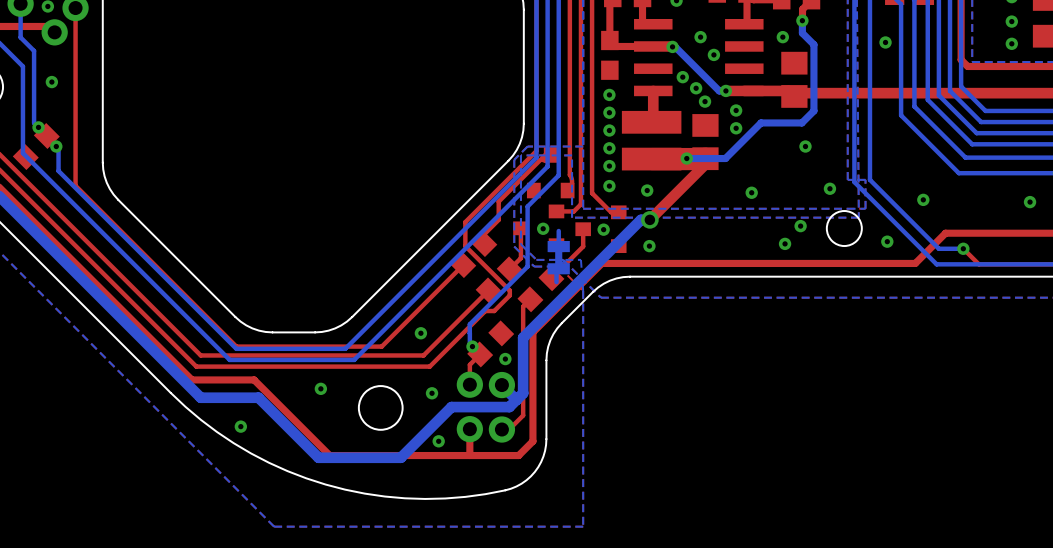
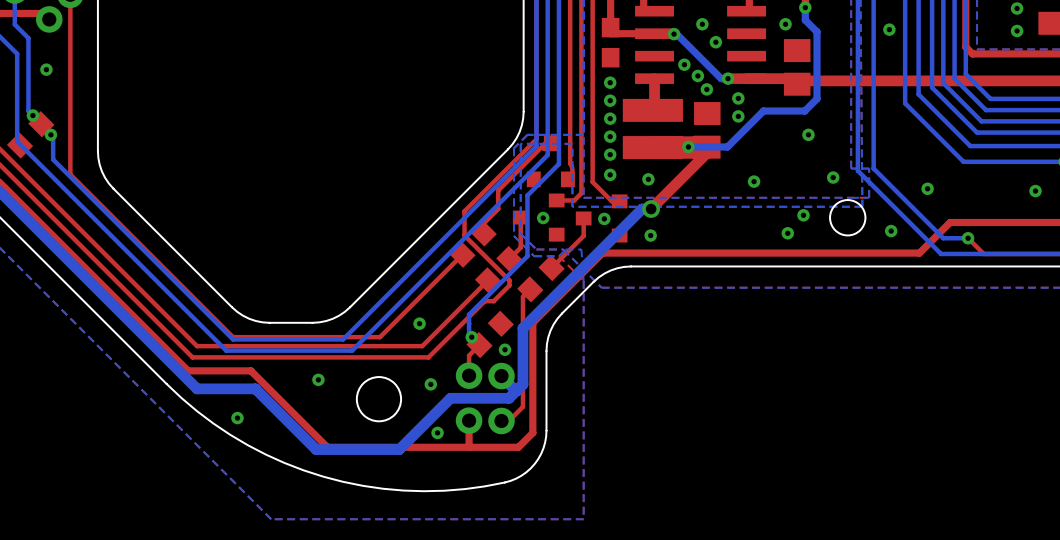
bottom track: (558, 230) (558, 246) -> none
part: (558, 257) -> none
bottom track: (556, 268) (556, 282) -> none

